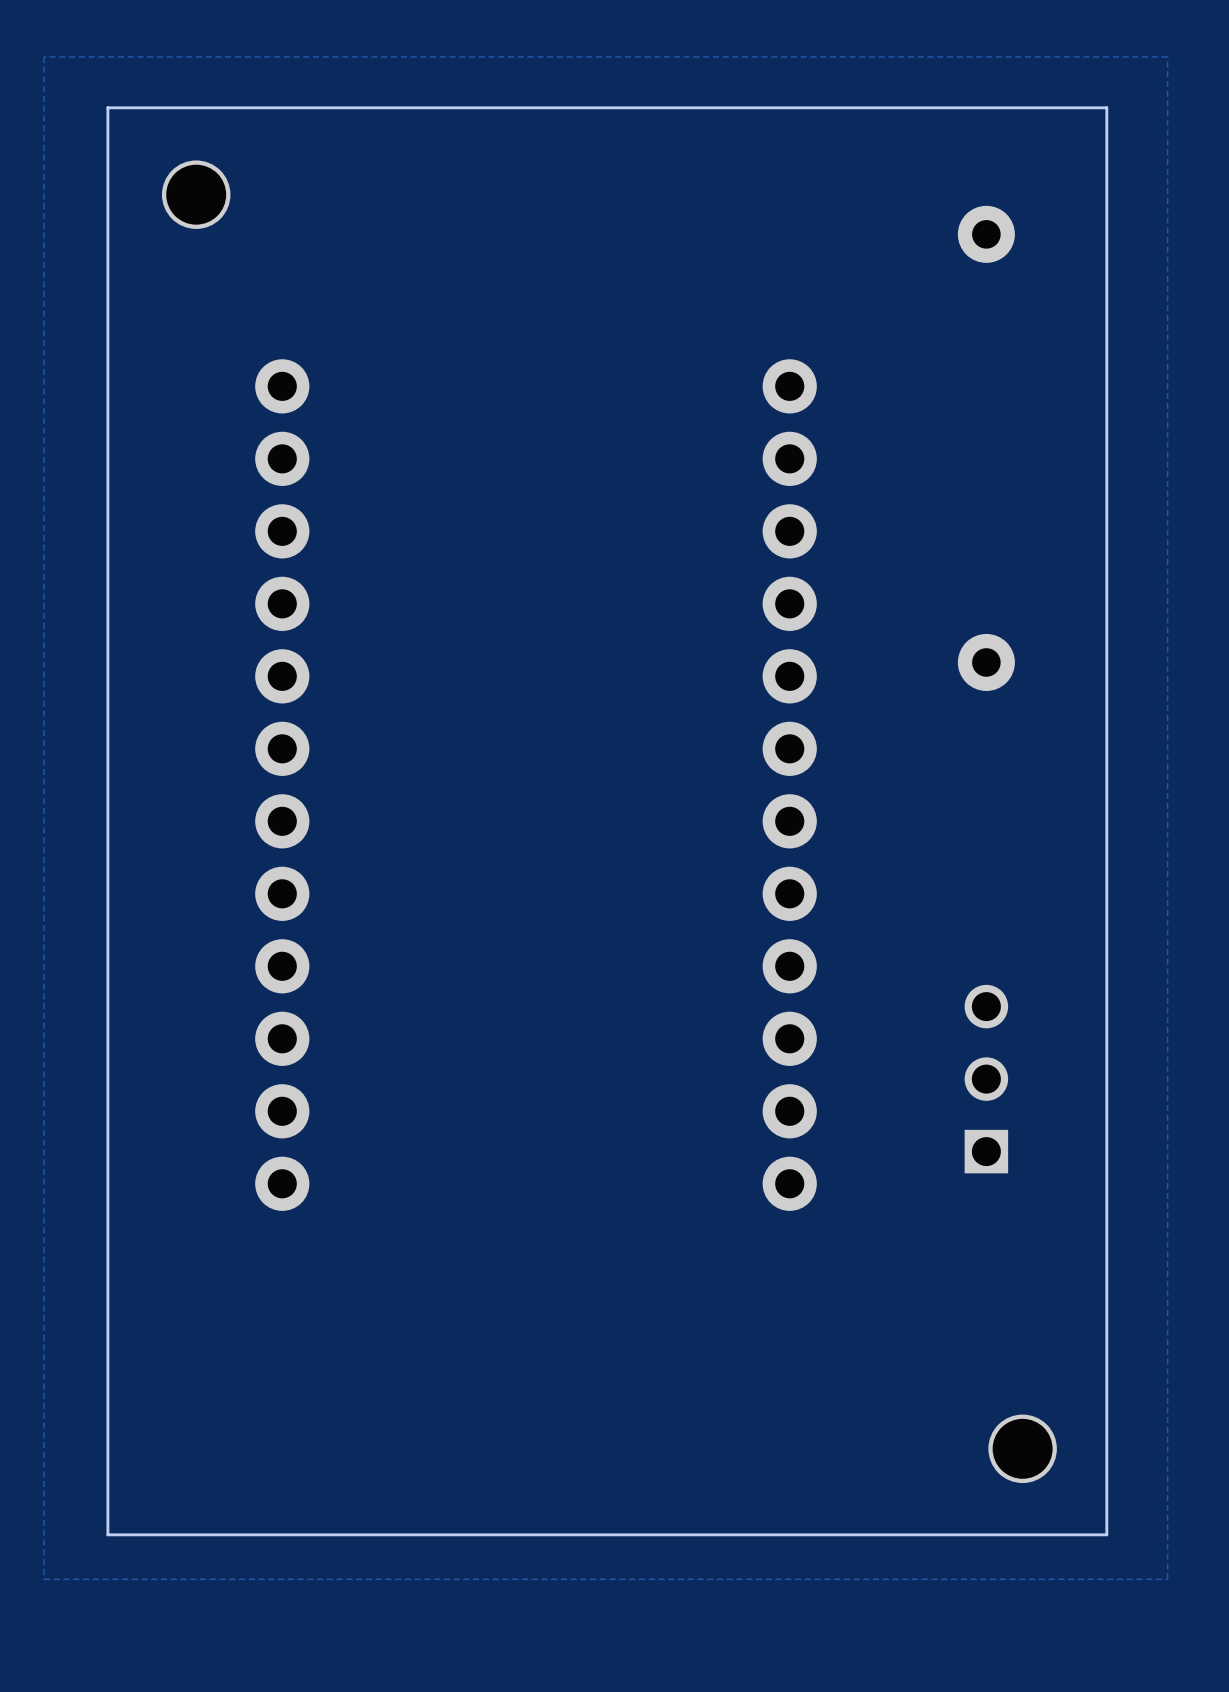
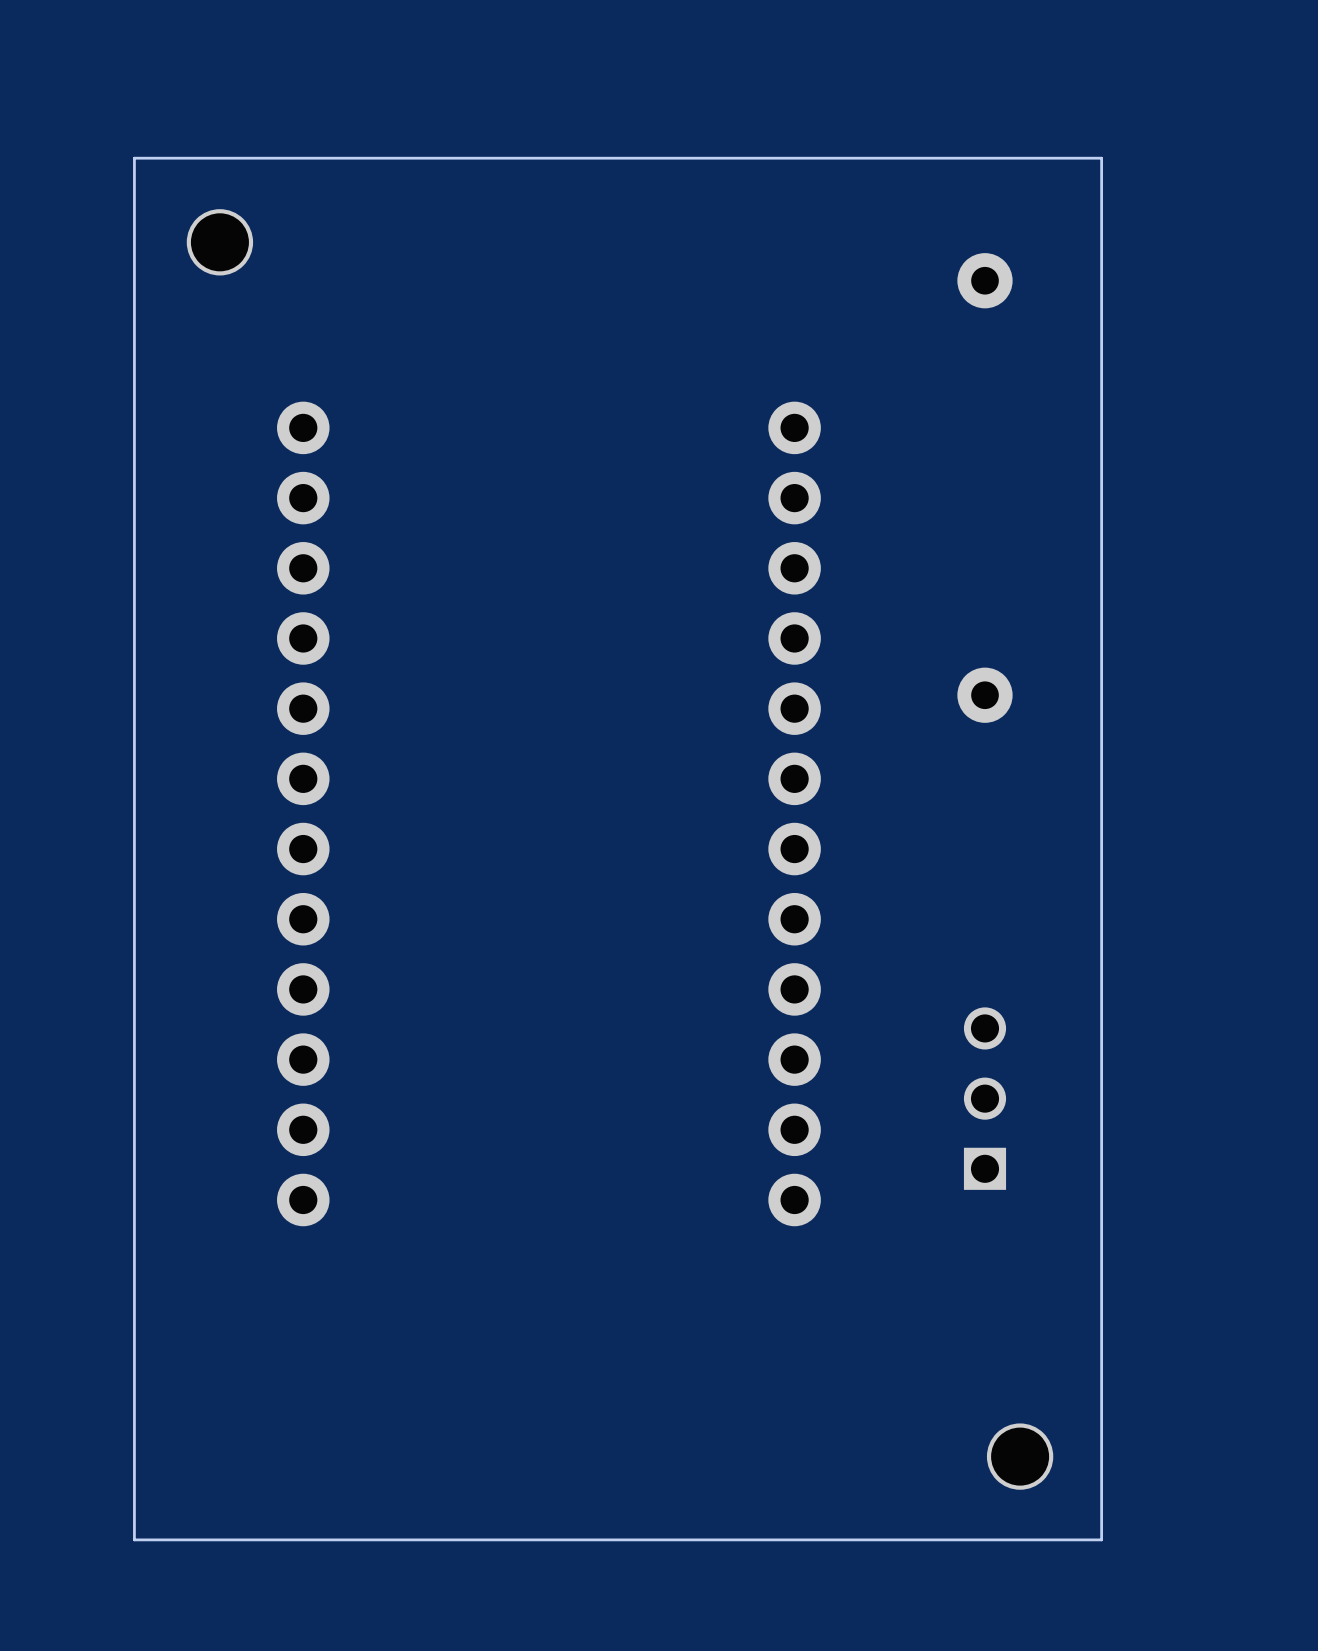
zone outline: (1167, 56) (43, 56) (43, 1579) (1167, 1579) (1167, 56) -> none

